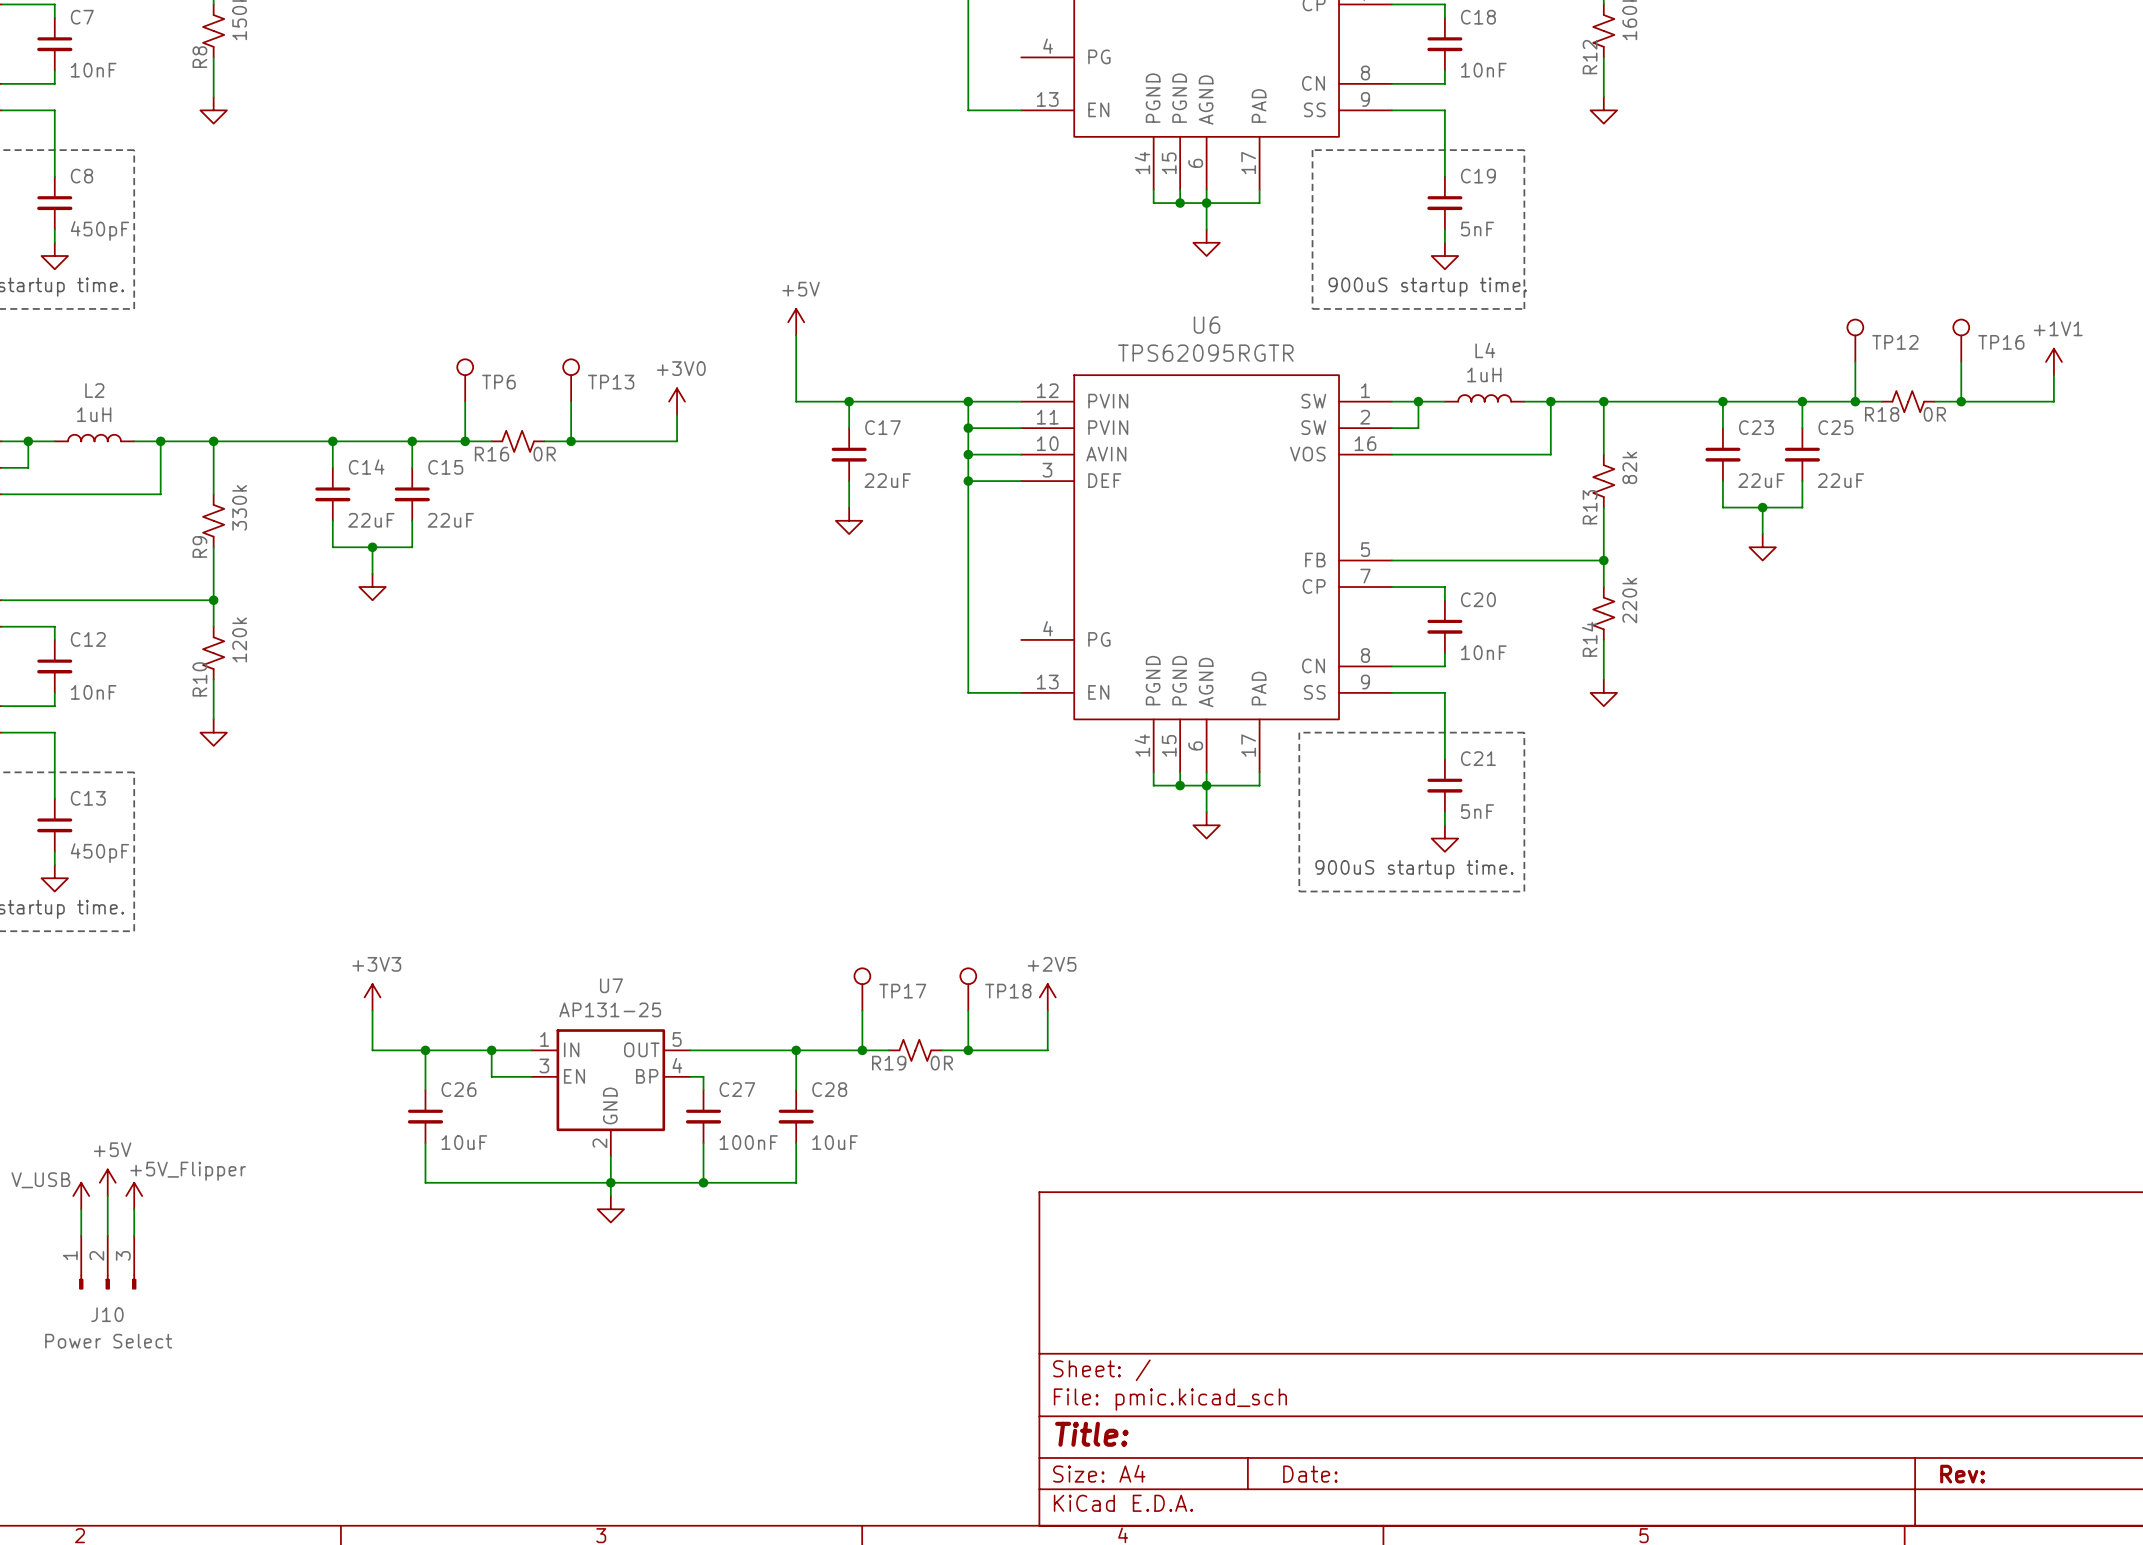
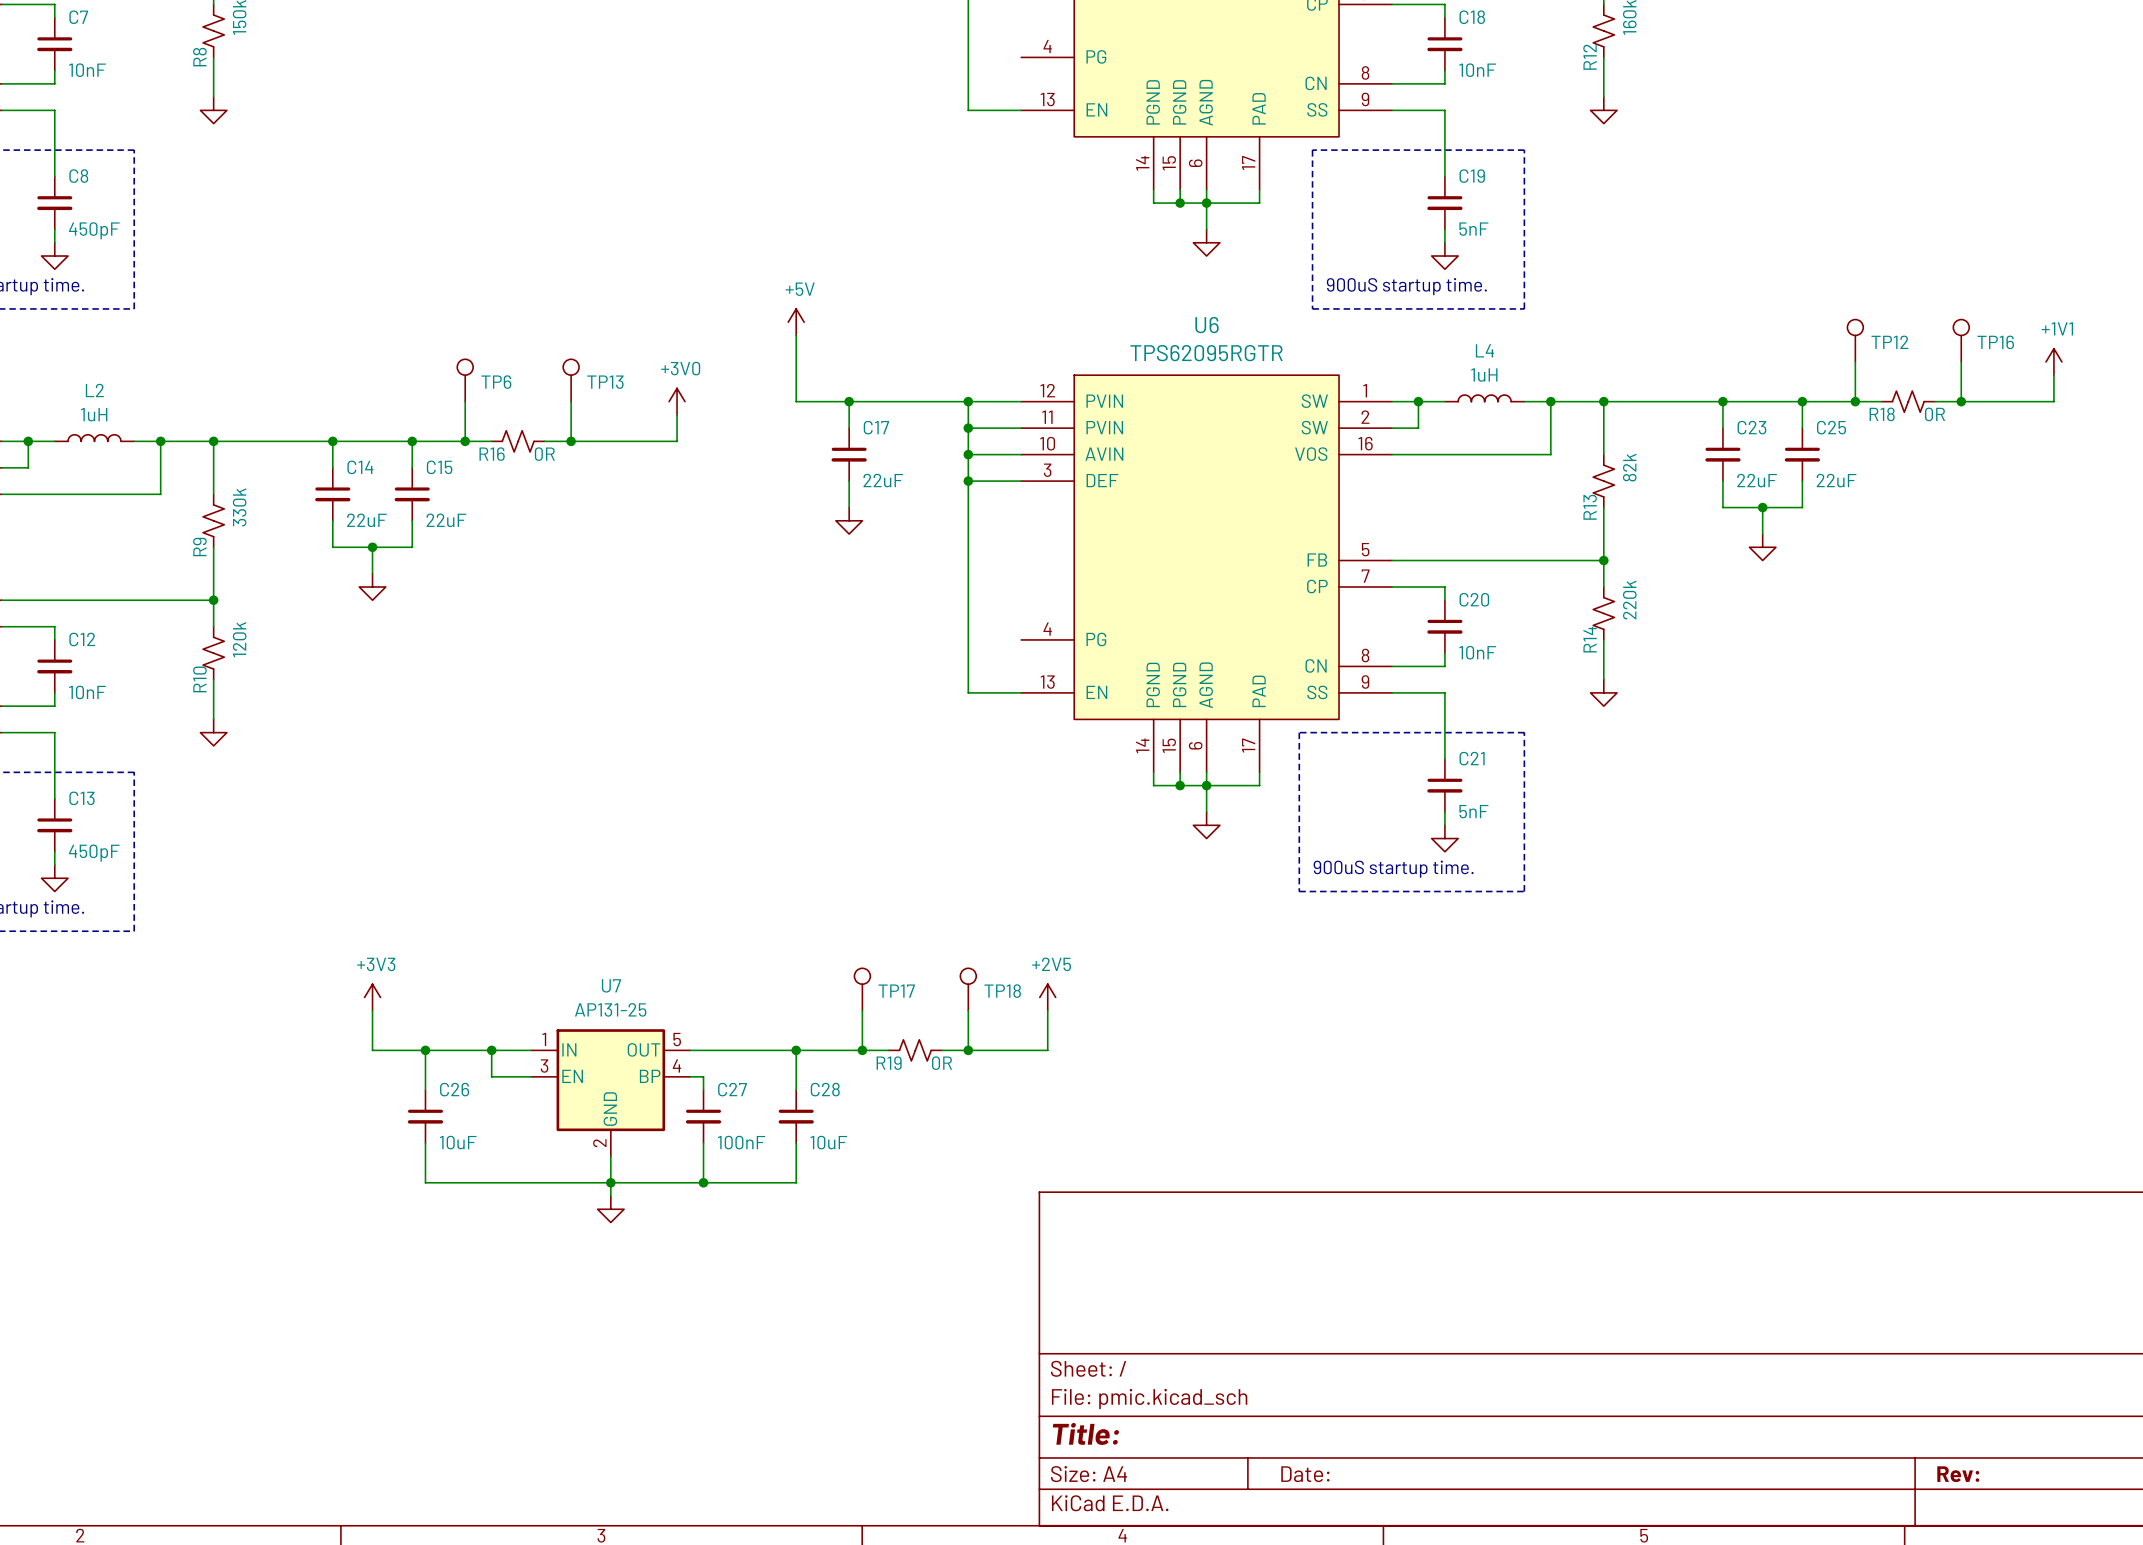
power symbol: +5V (107, 1182) -> none
power symbol: V_USB (81, 1196) -> none
wire: (107, 1196) (107, 1235) -> none
power symbol: +5V_Flipper (134, 1196) -> none
wire: (81, 1209) (81, 1235) -> none
wire: (134, 1209) (134, 1235) -> none
J10: Power Select (107, 1262) -> none

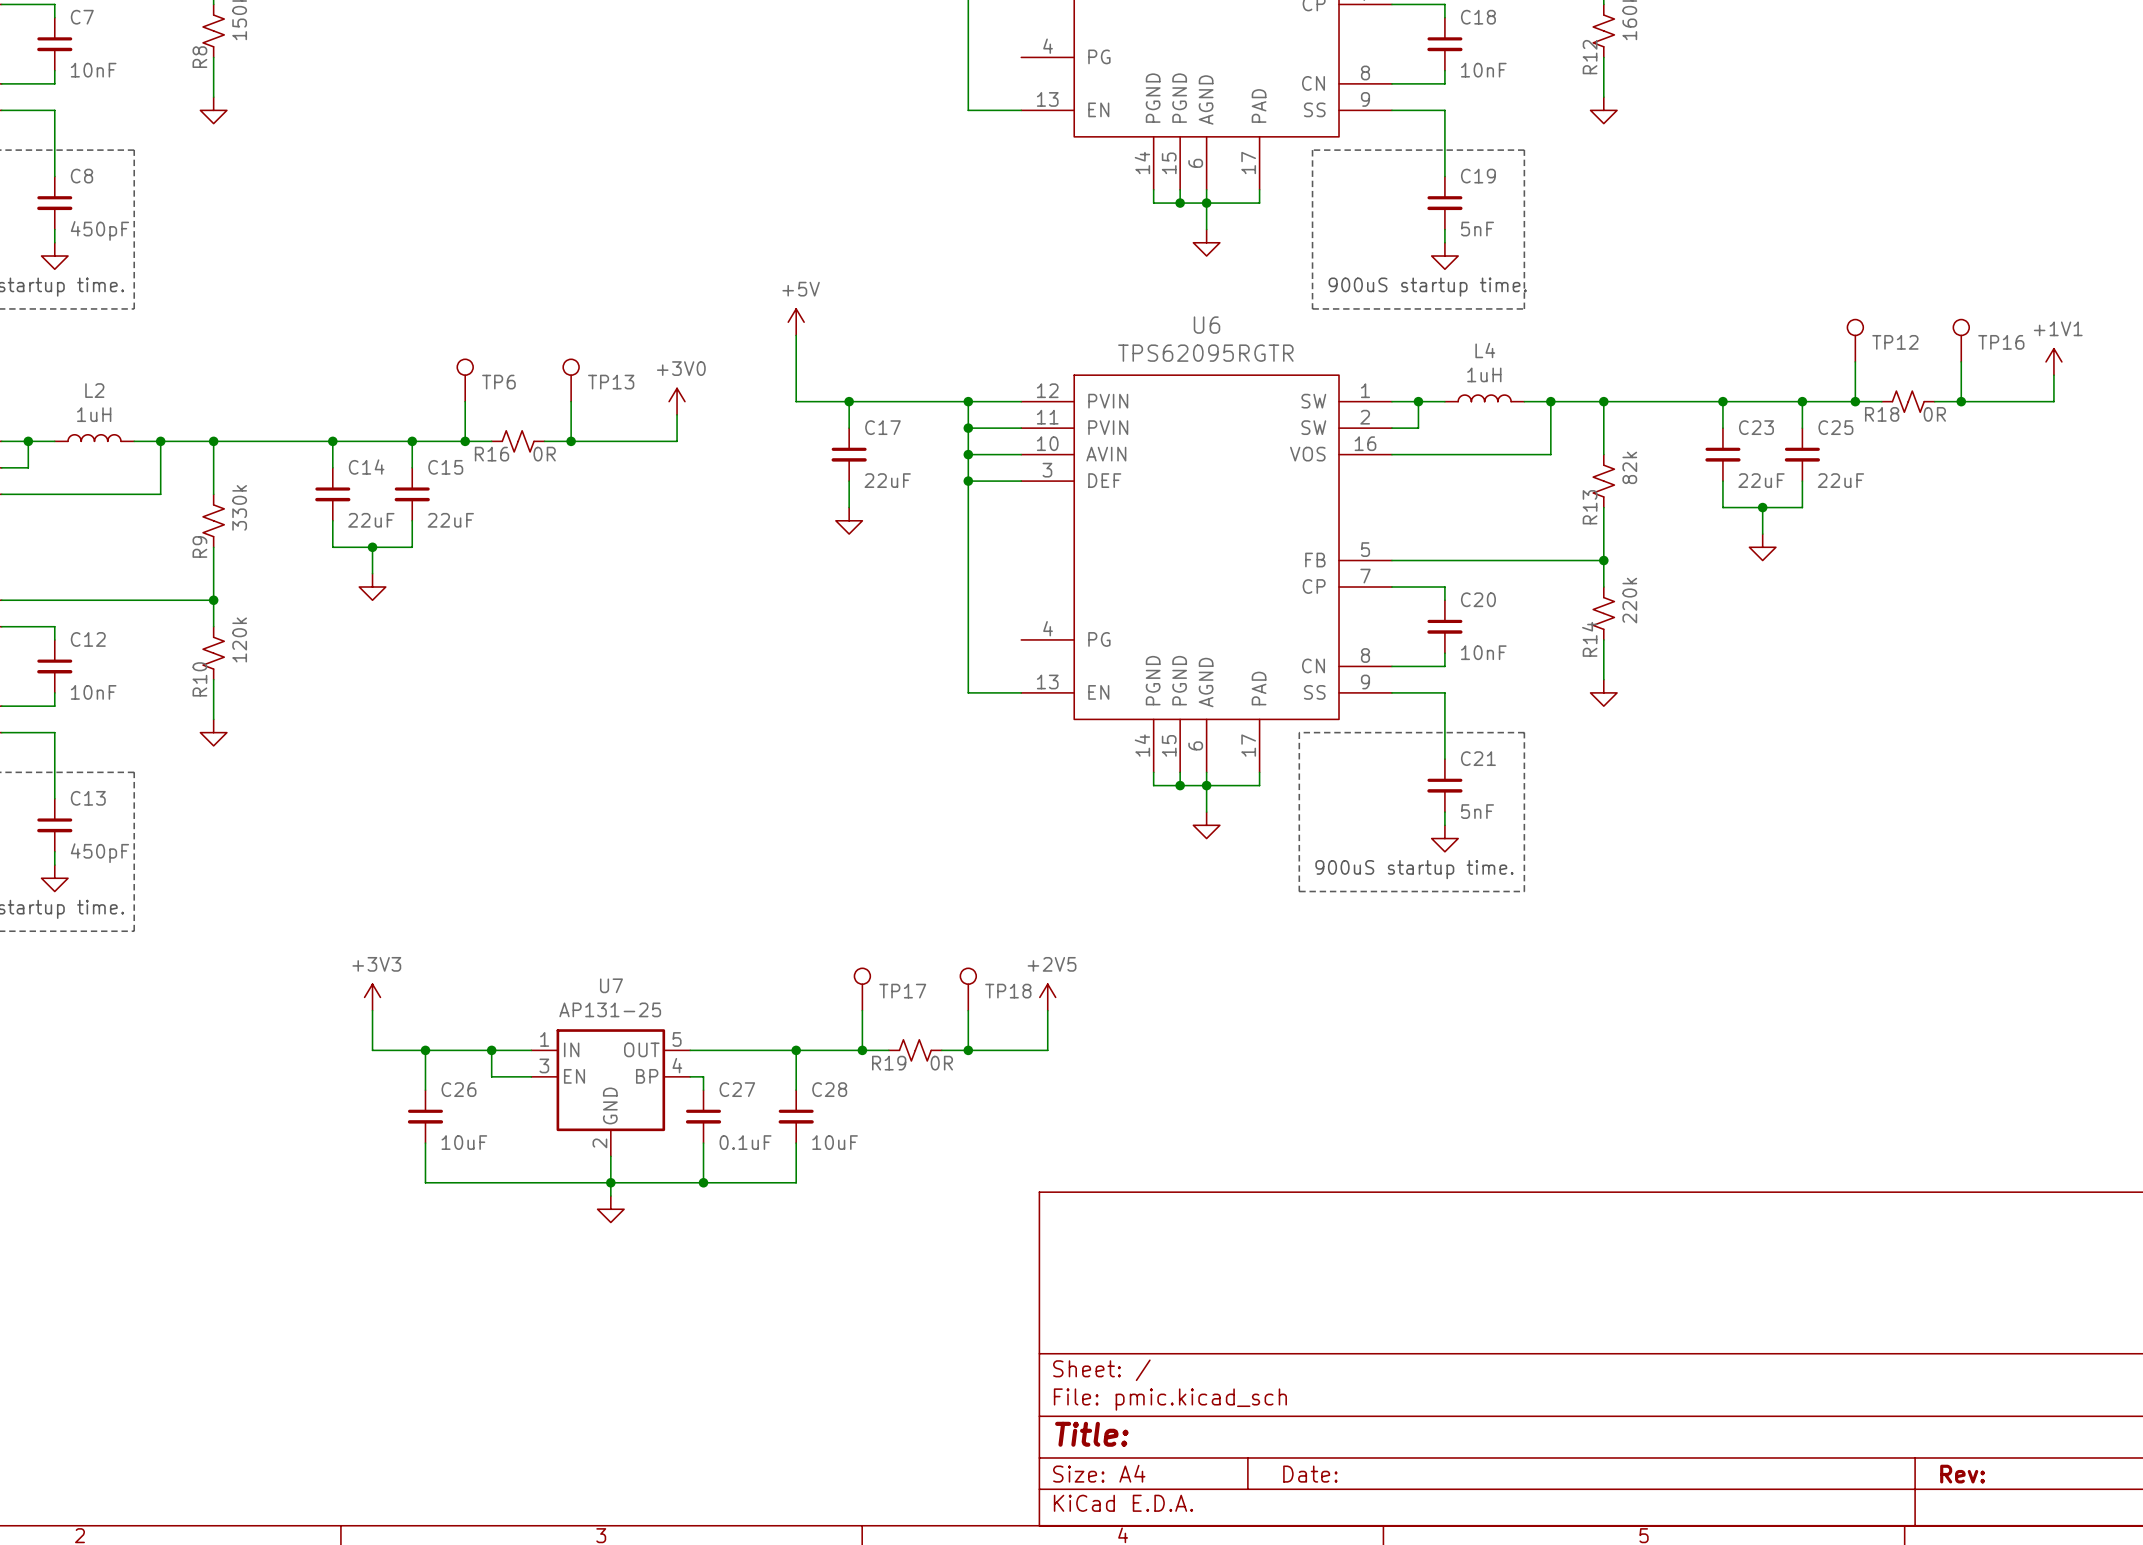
C27 value: 100nF (741, 1142) -> 0.1uF (745, 1142)

